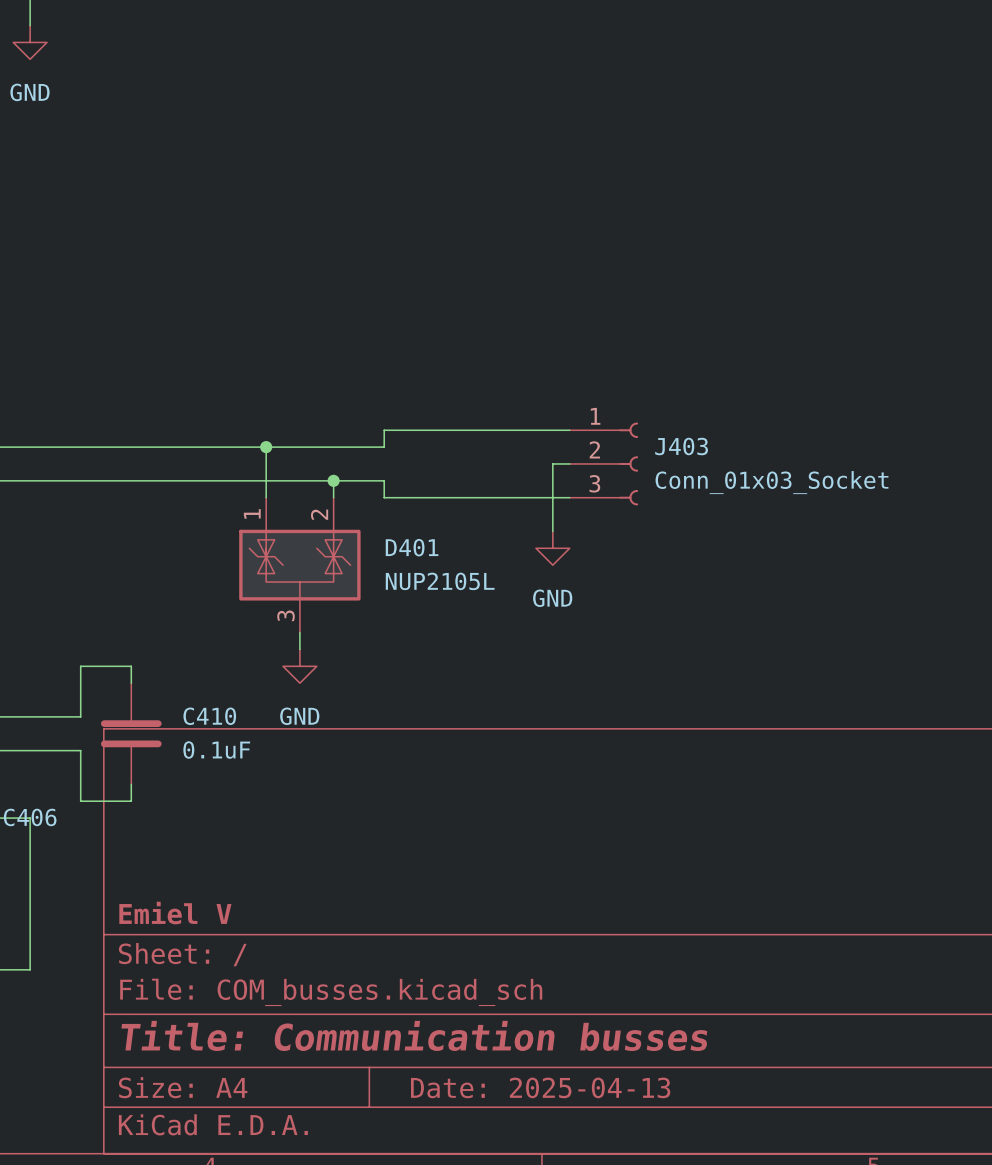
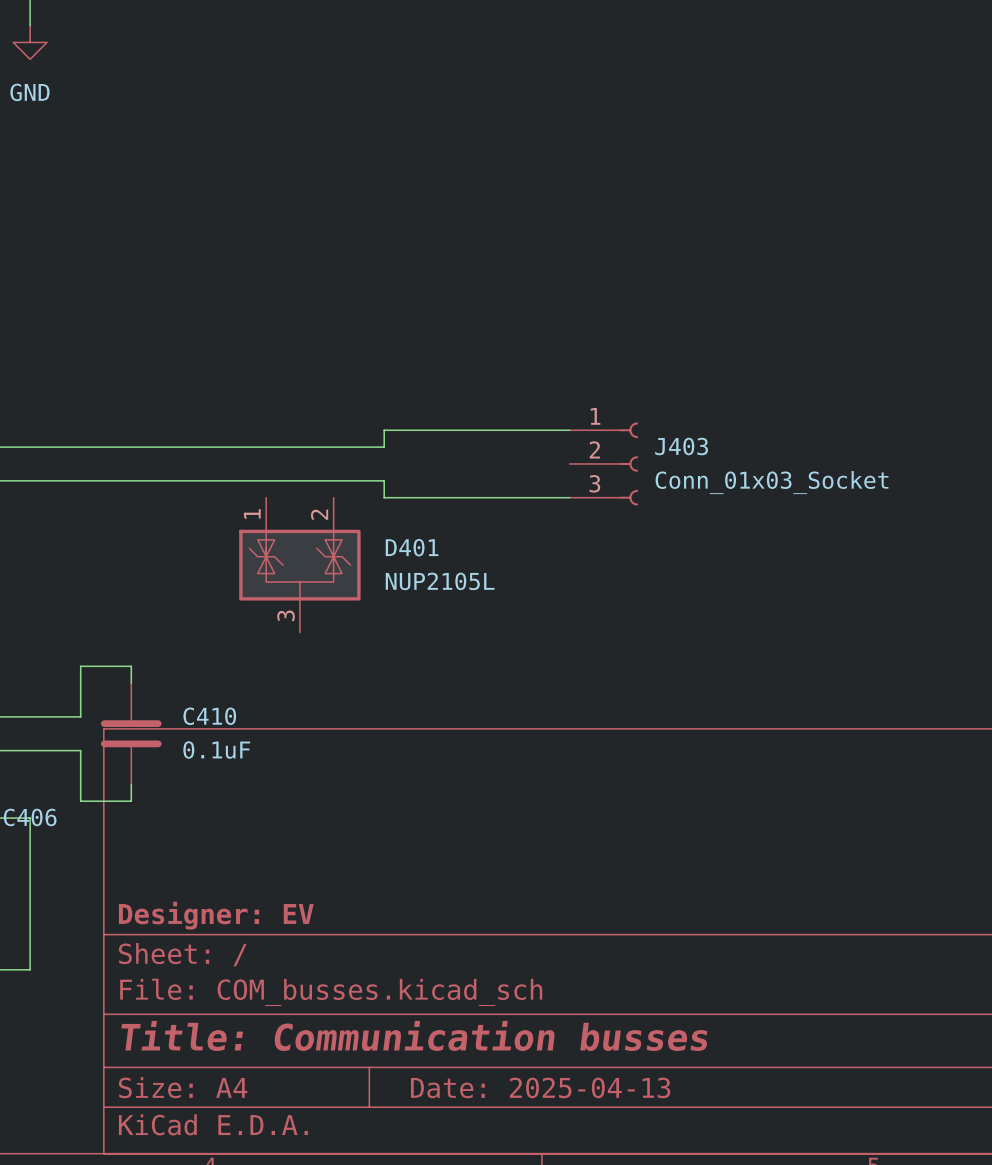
wire: (266, 447) (266, 497) -> none
junction: (266, 447) -> none
wire: (569, 463) (552, 463) (552, 531) -> none
wire: (333, 480) (333, 497) -> none
junction: (333, 480) -> none
power symbol: GND (552, 548) -> none
wire: (299, 632) (299, 649) -> none
power symbol: GND (299, 666) -> none
title block: Emiel V (175, 913) -> Designer: EV (216, 915)

